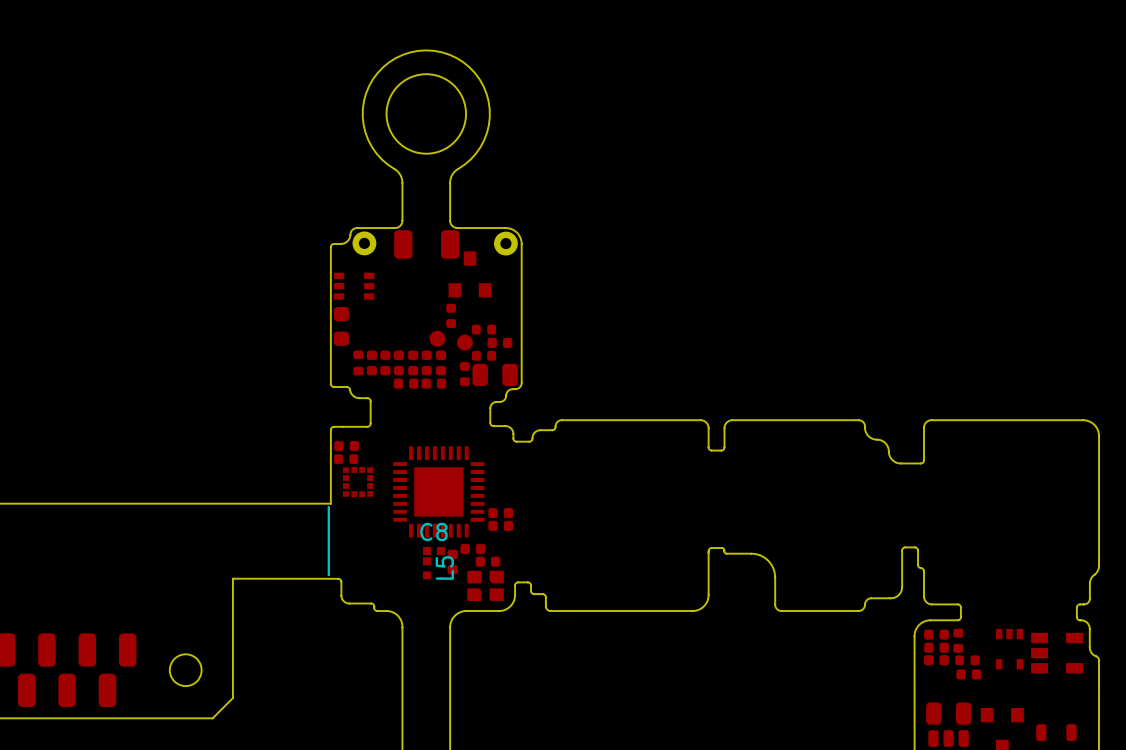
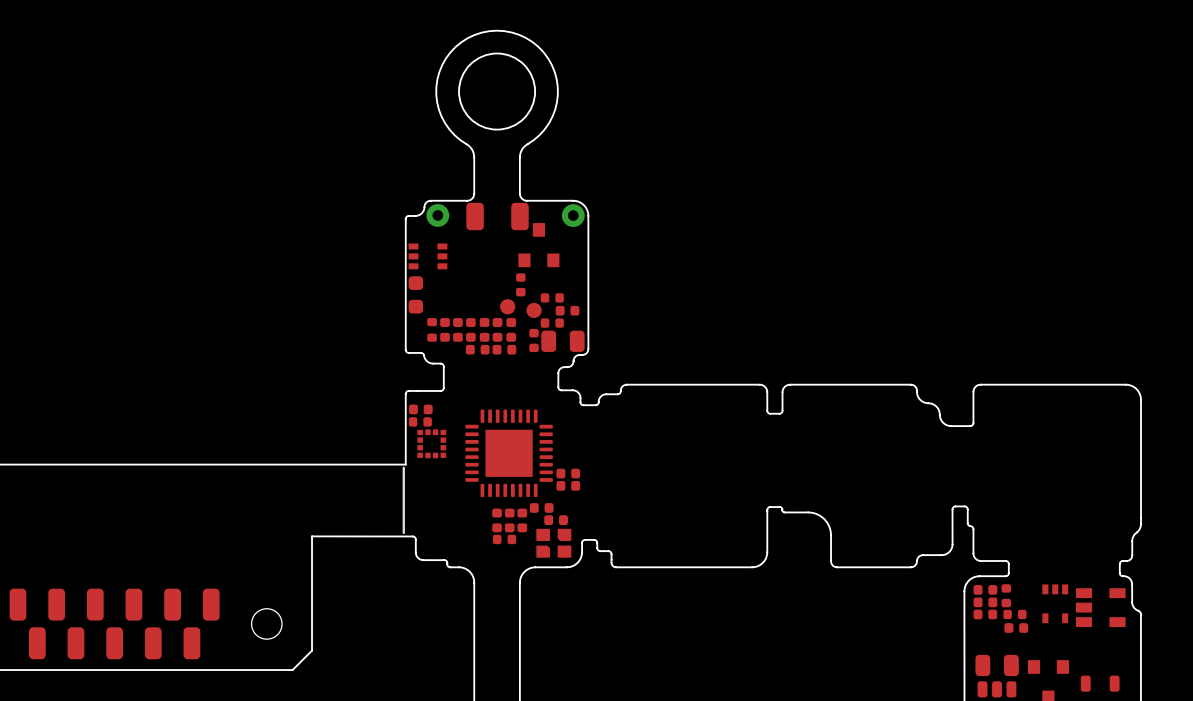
C8: (433, 551) -> none
part: none -> (497, 520)
part: none -> (509, 520)
L5: (426, 568) -> none
part: none -> (504, 539)

